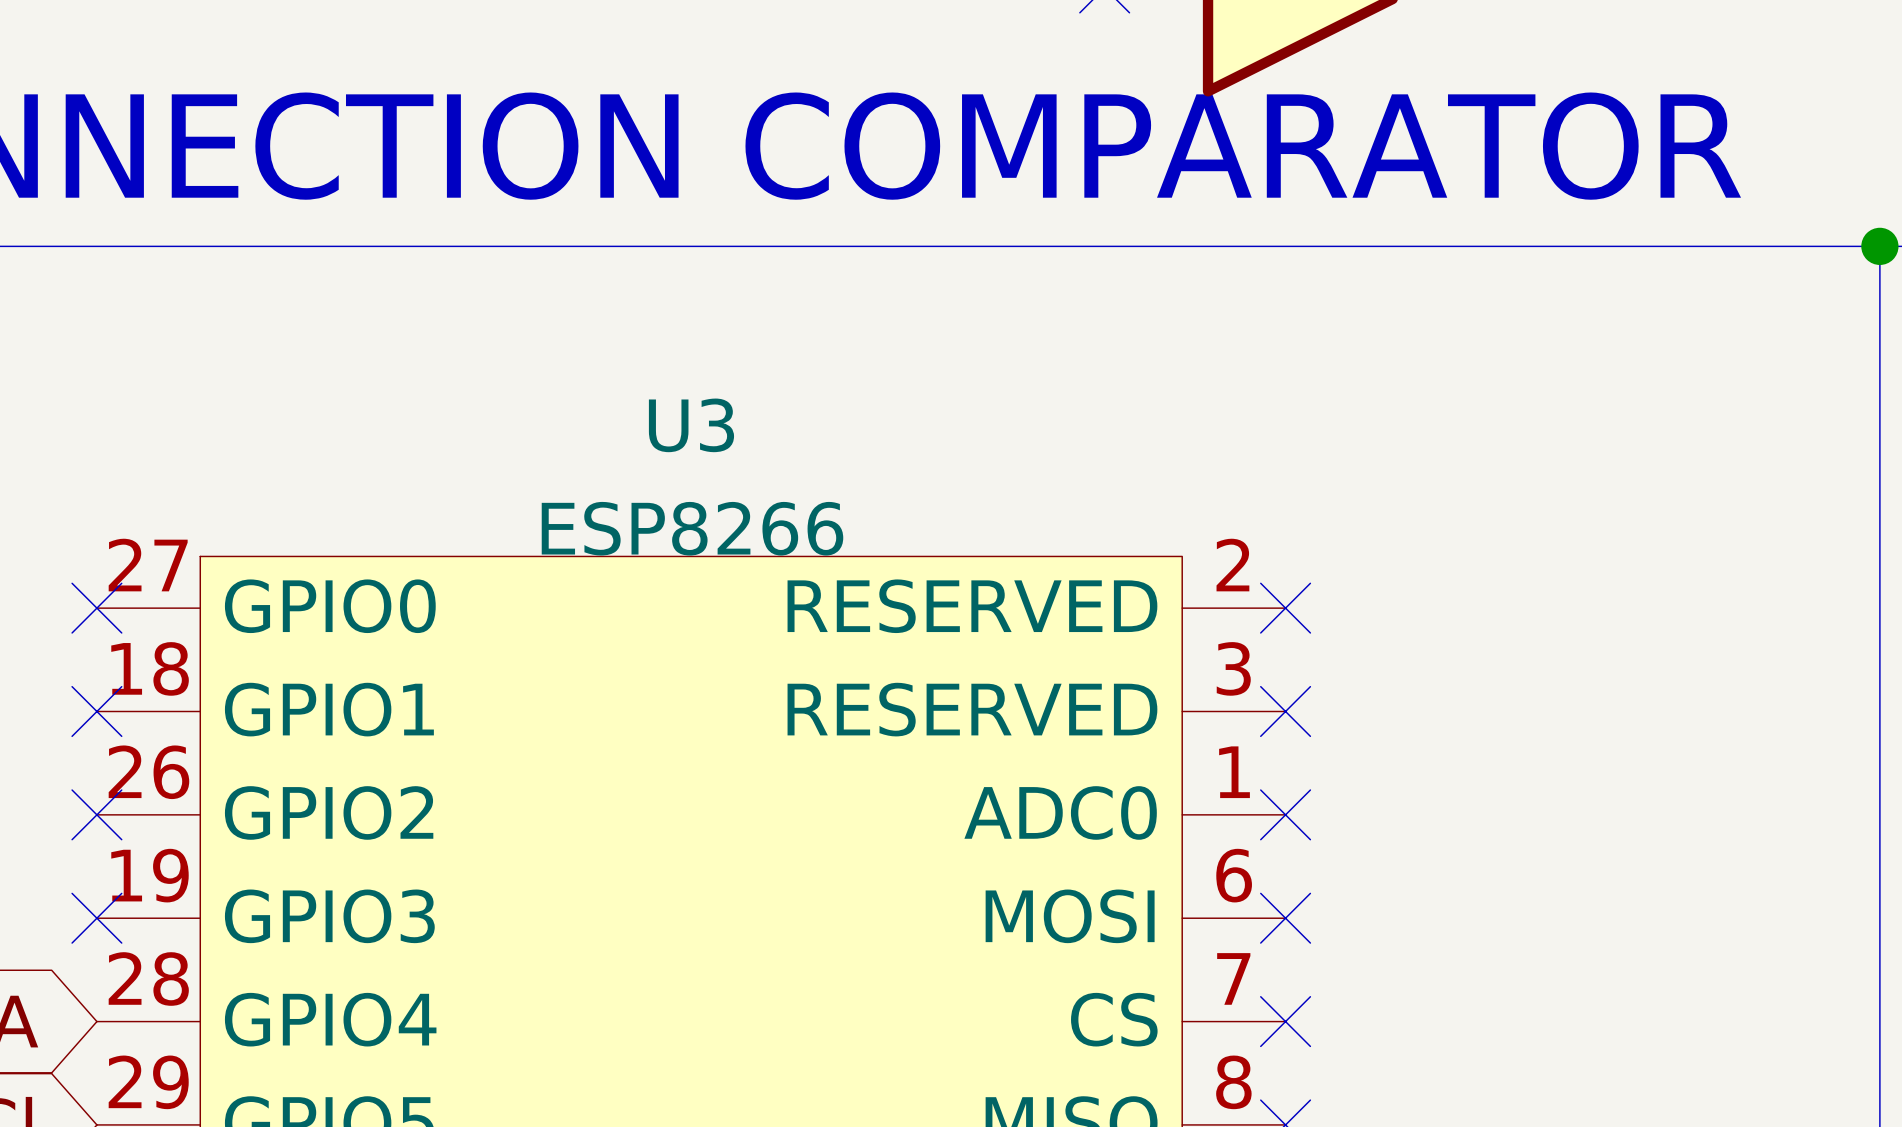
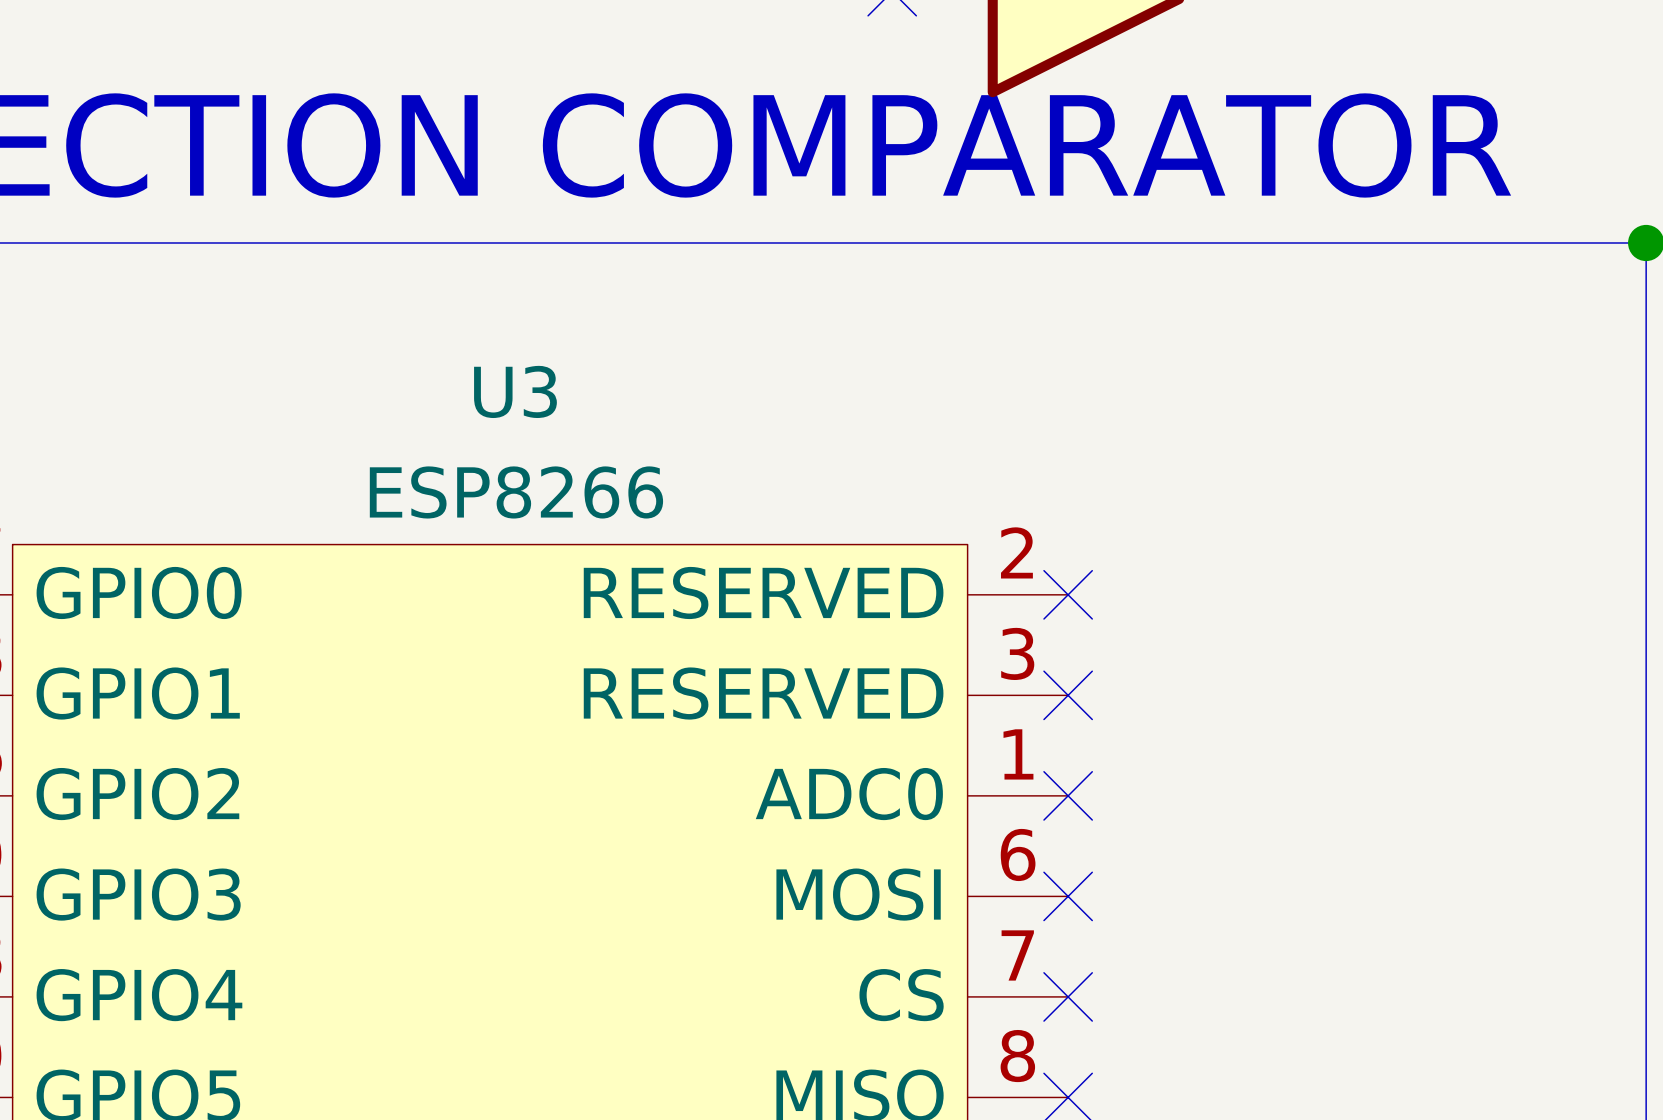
U3 name position: U3 (691, 425) -> U3 (515, 391)
U3 value position: ESP8266 (692, 528) -> ESP8266 (516, 492)

